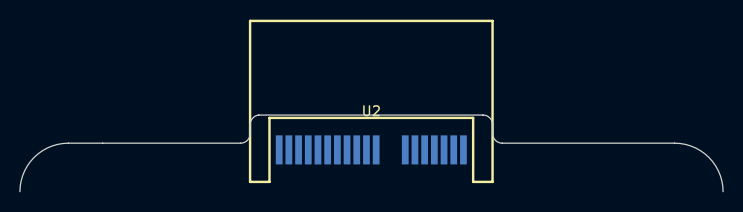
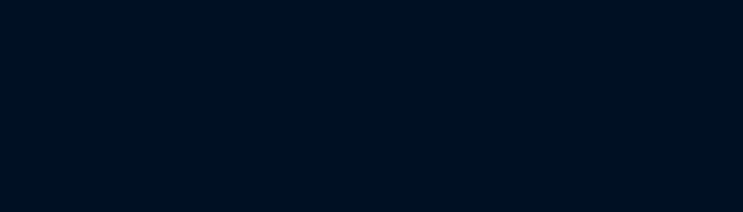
U2: (371, 101) -> none
drawing: [19, 114, 724, 192] -> none

